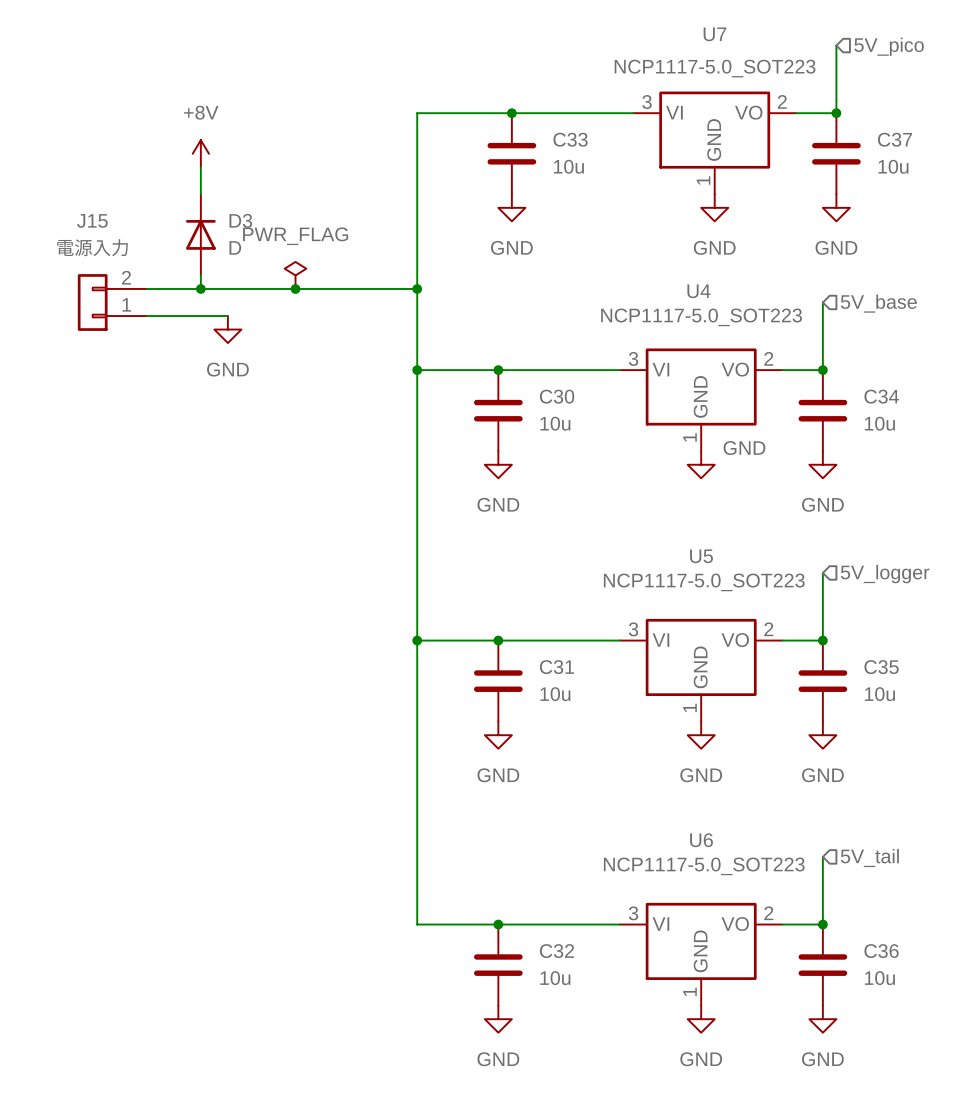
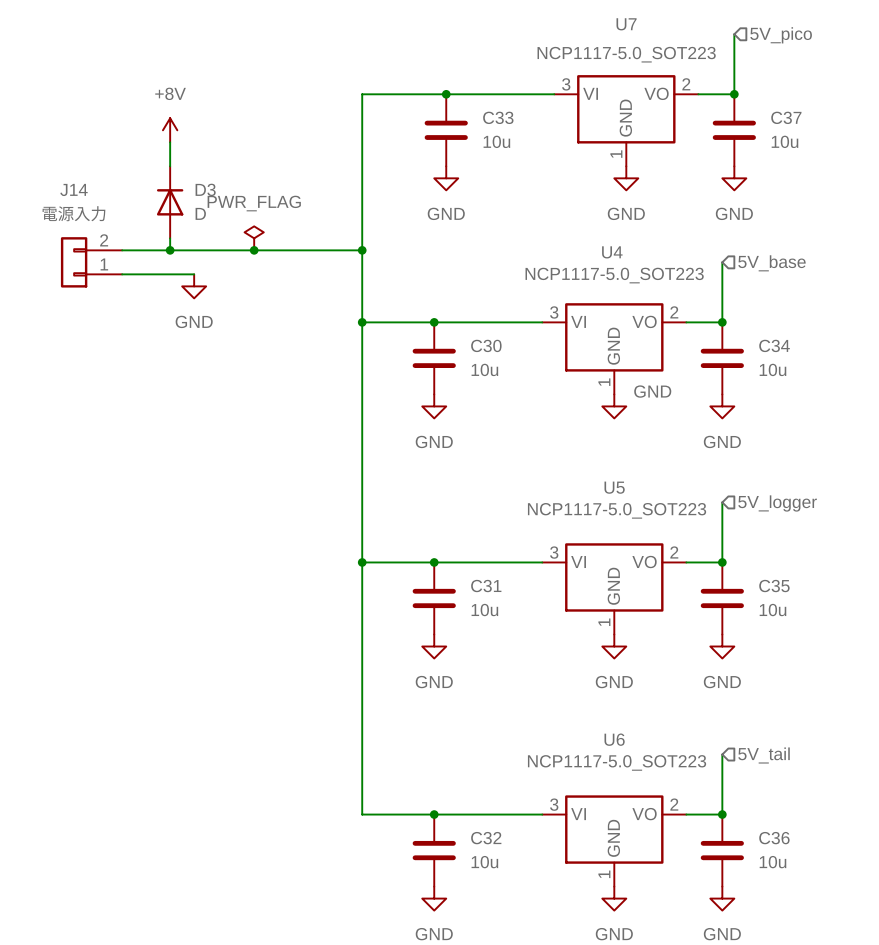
J15 name: J15 (92, 220) -> J14 (74, 189)

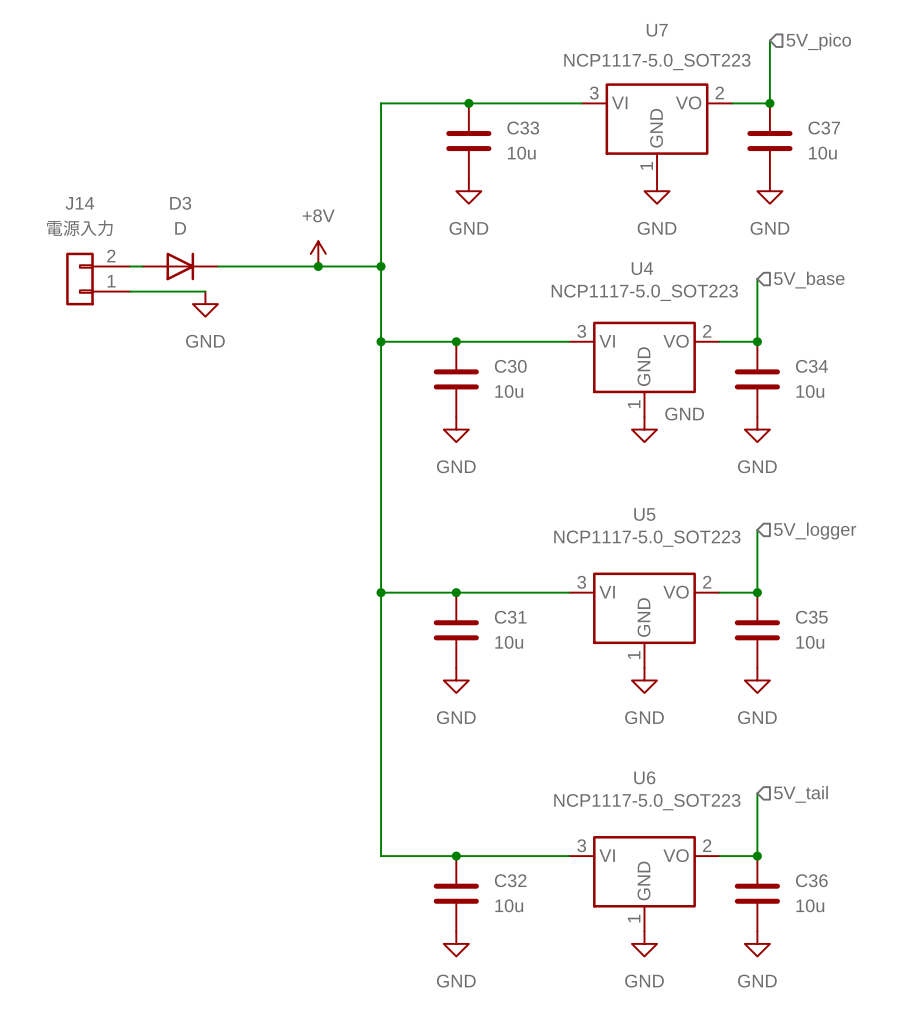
power symbol position: +8V (170, 130) -> +8V (318, 253)
wire: (170, 142) (170, 166) -> none
D3 name position: D3 (205, 189) -> D3 (180, 203)
D3 rotation: 0° (170, 202) -> 90° clockwise (180, 266)
D3 position: (170, 202) -> (180, 266)
D3 value position: D (200, 213) -> D (180, 228)
wire: (170, 238) (170, 250) -> none
power symbol: PWR_FLAG (254, 238) -> none
junction: (170, 250) -> none
junction position: (254, 250) -> (318, 266)

